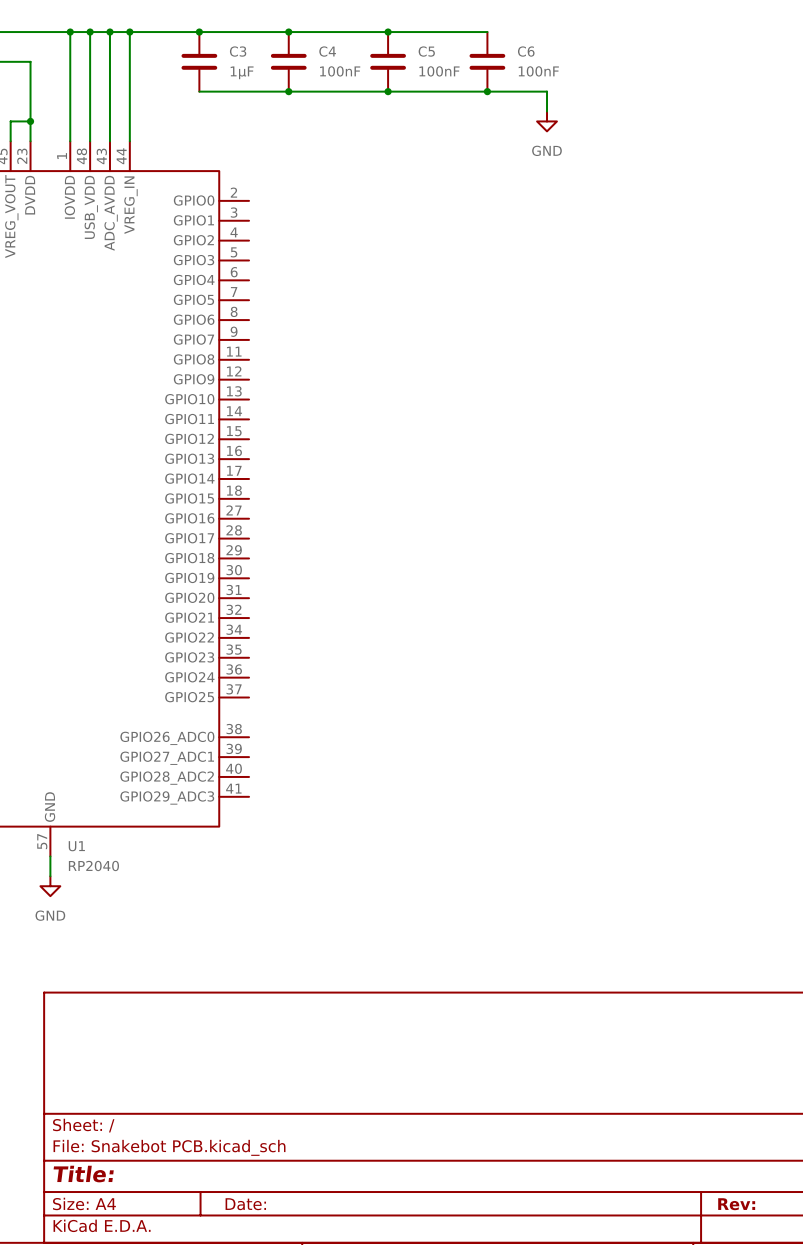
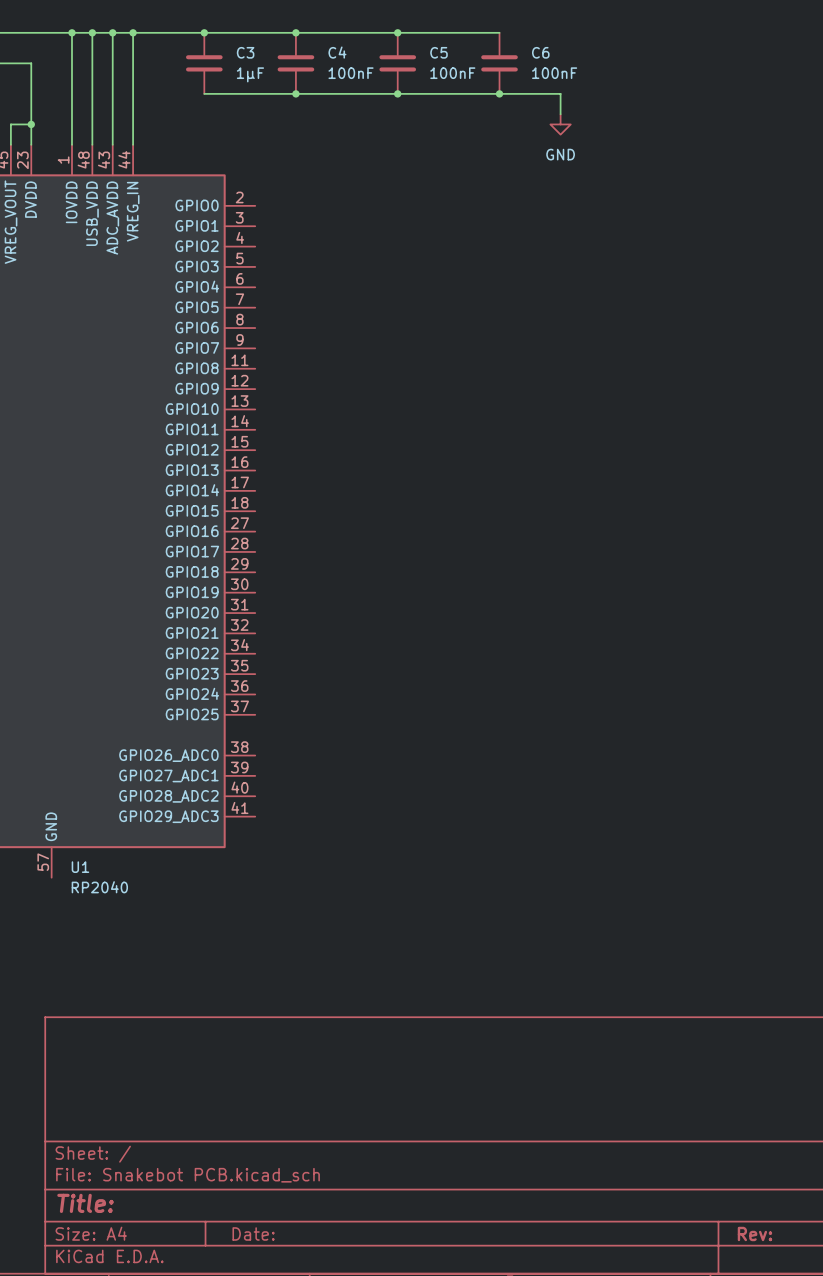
wire: (50, 856) (50, 876) -> none
power symbol: GND (50, 886) -> none

